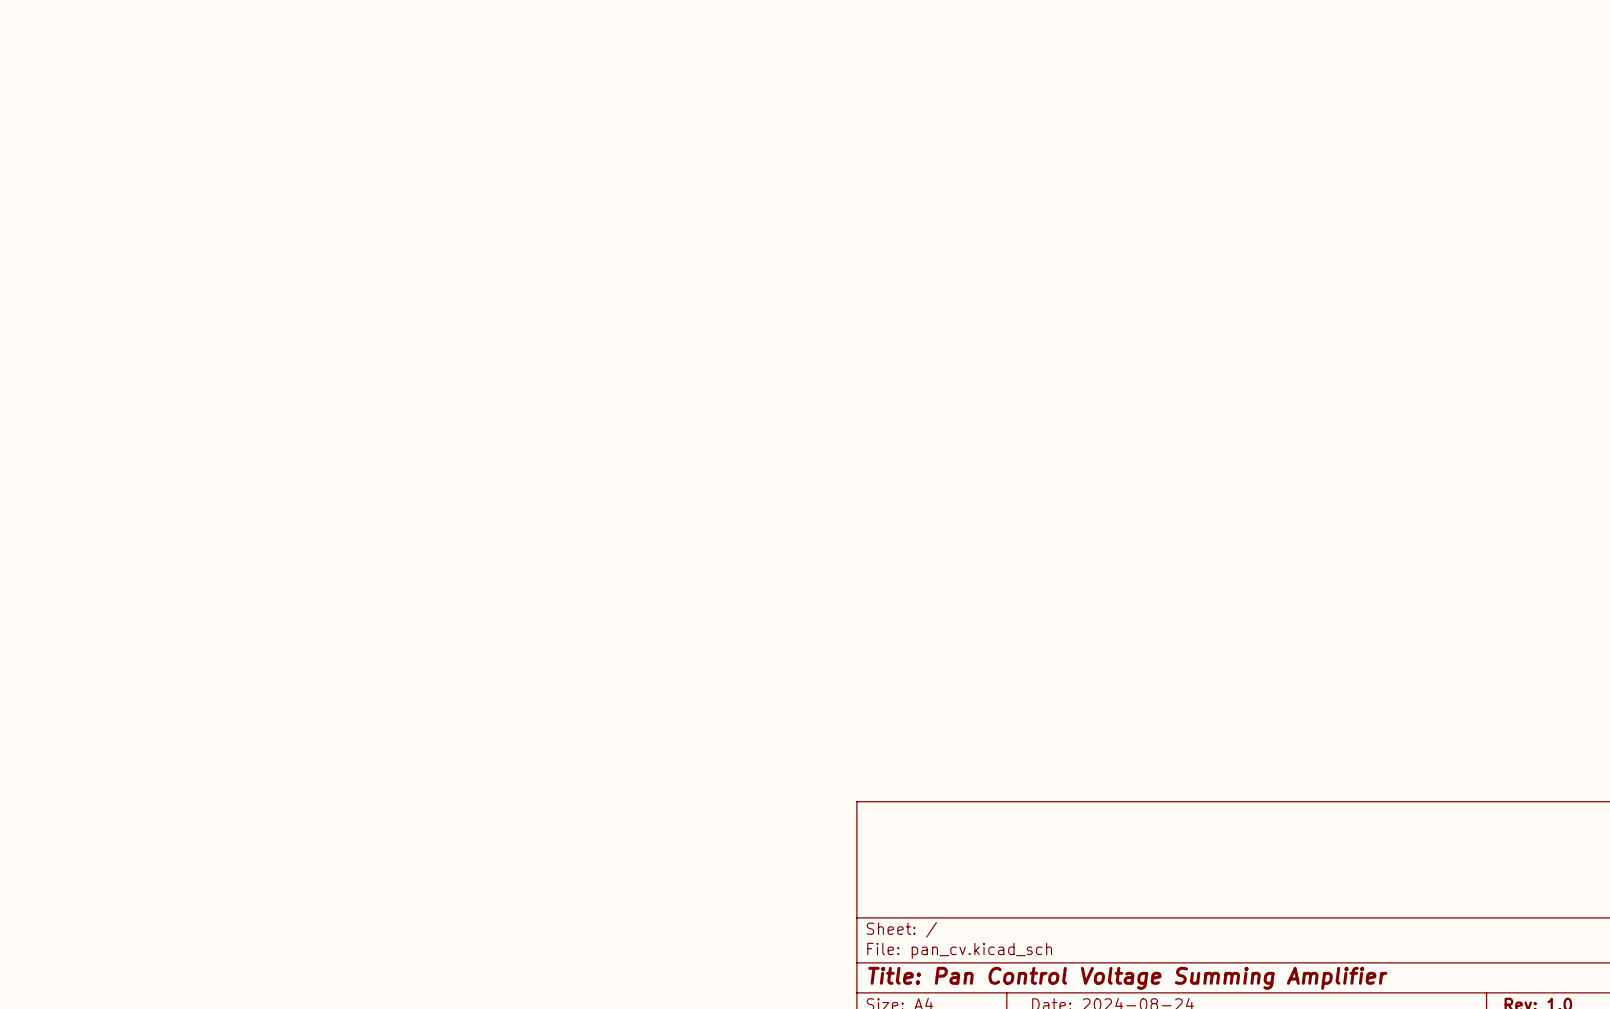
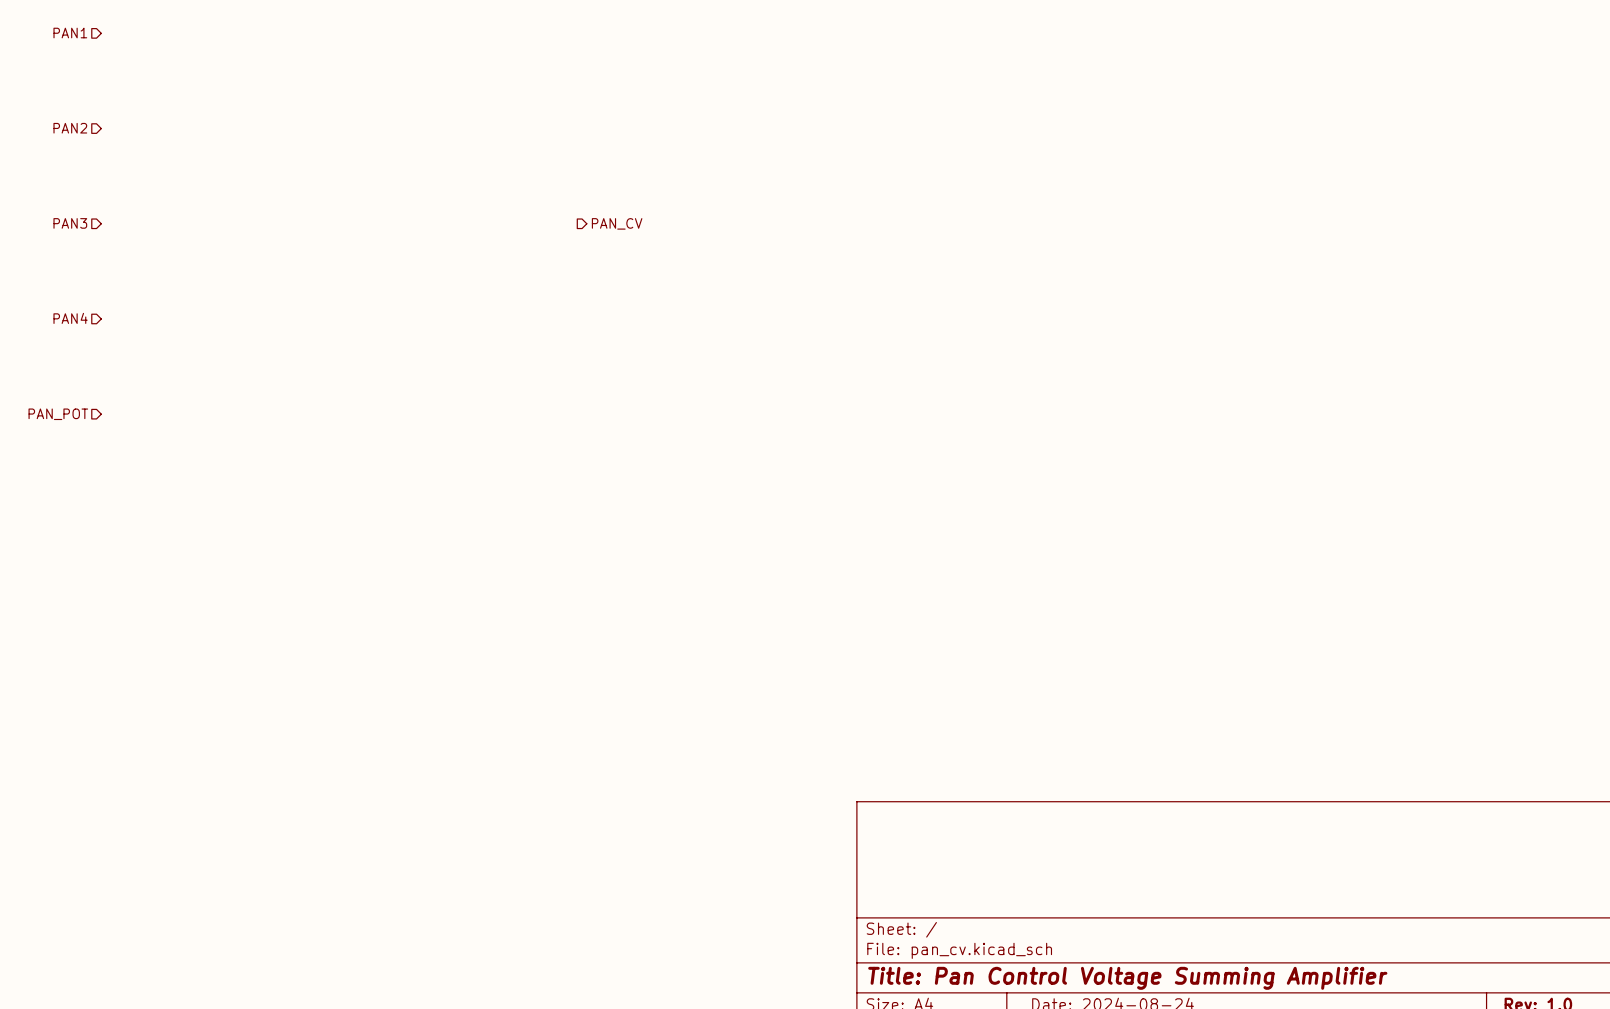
hierarchical label: none -> PAN1 (70, 33)
hierarchical label: none -> PAN2 (70, 128)
hierarchical label: none -> PAN3 (70, 223)
hierarchical label: none -> PAN_CV (617, 223)
hierarchical label: none -> PAN4 (70, 318)
hierarchical label: none -> PAN_POT (58, 414)

